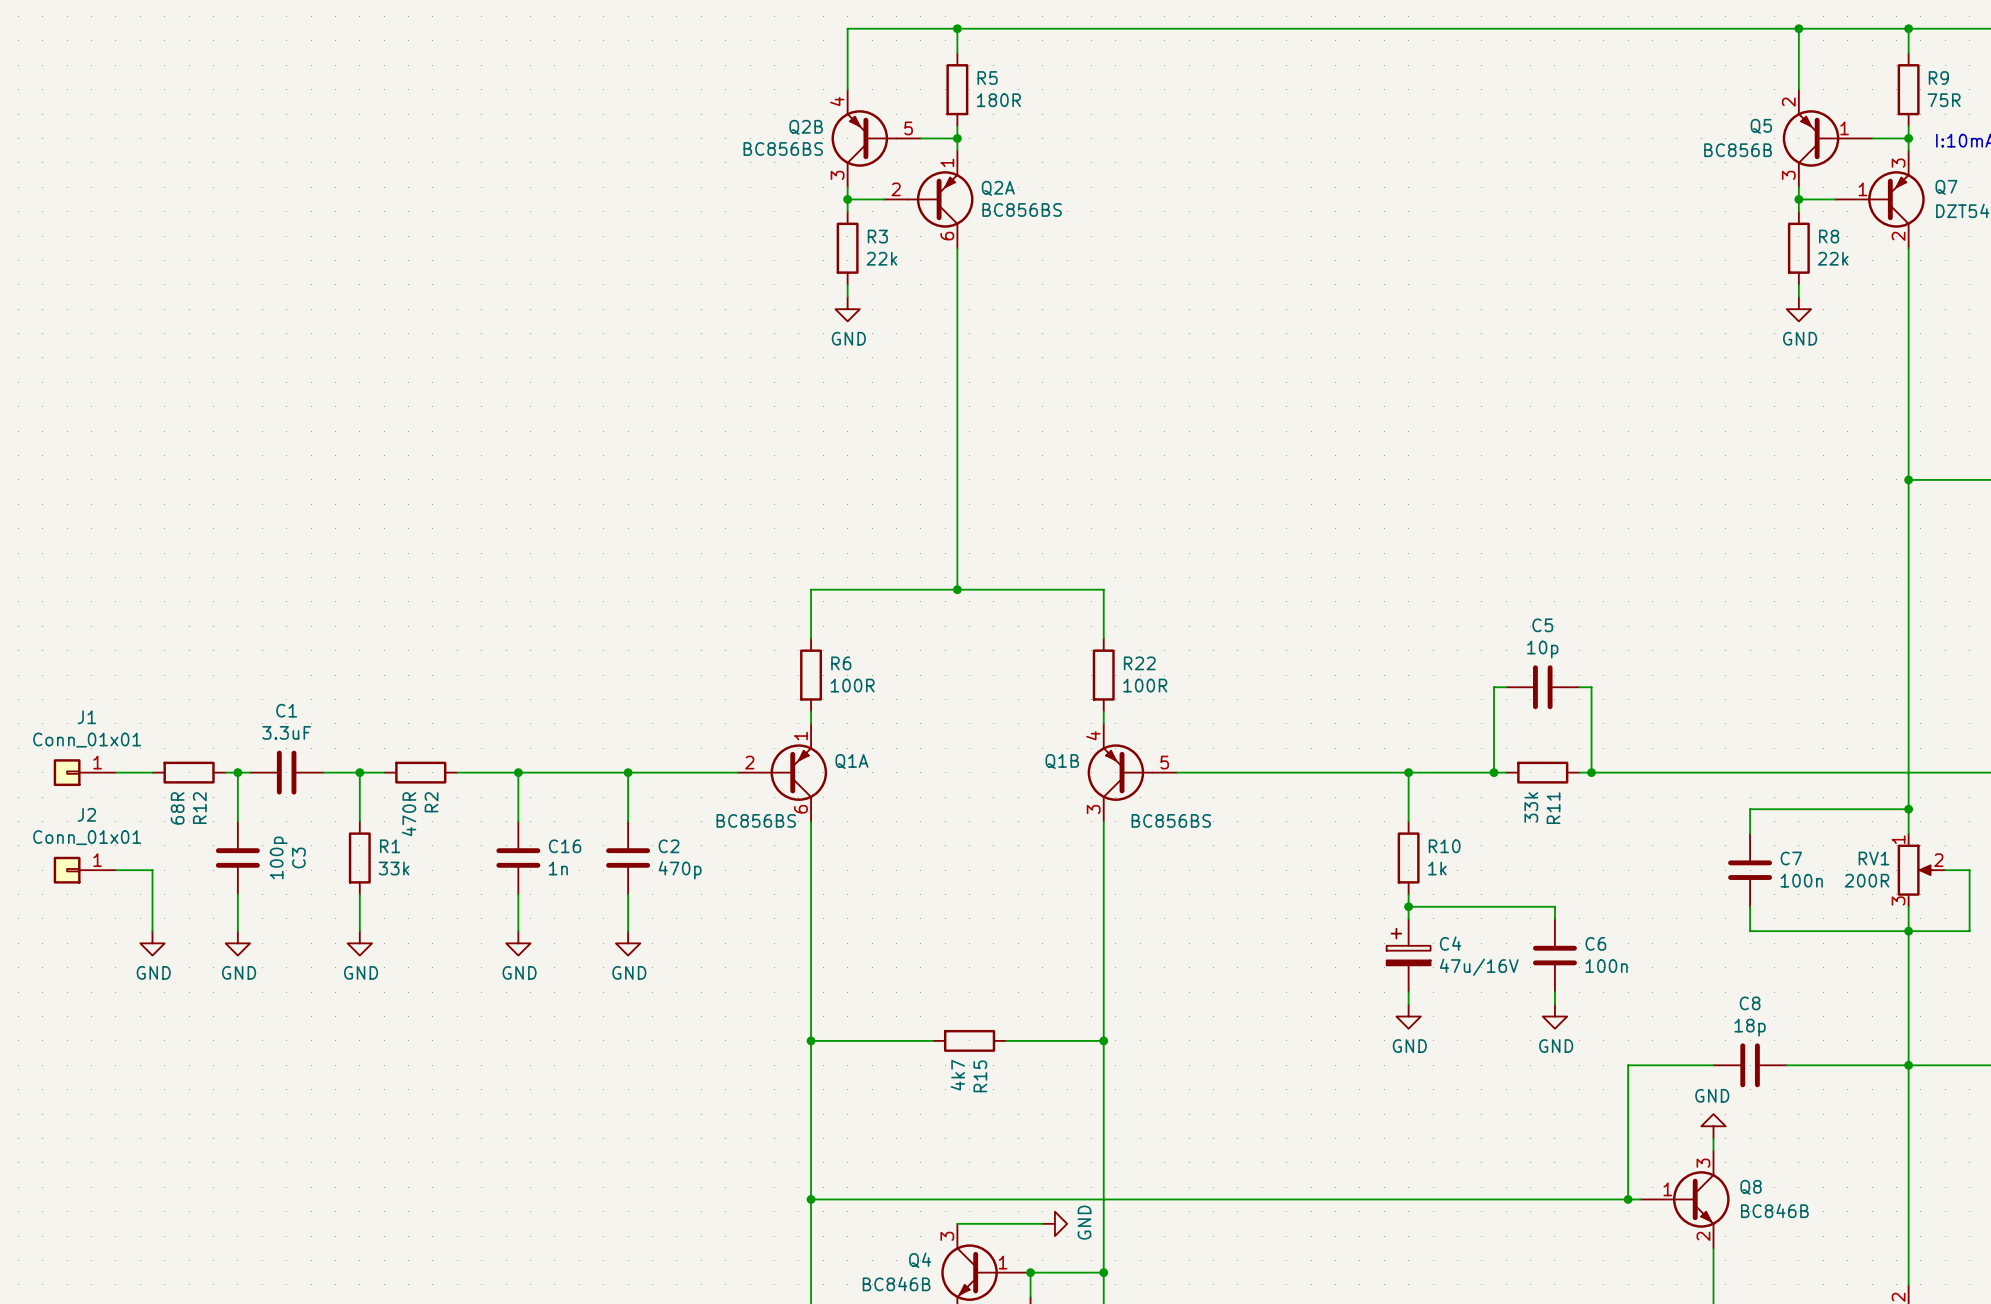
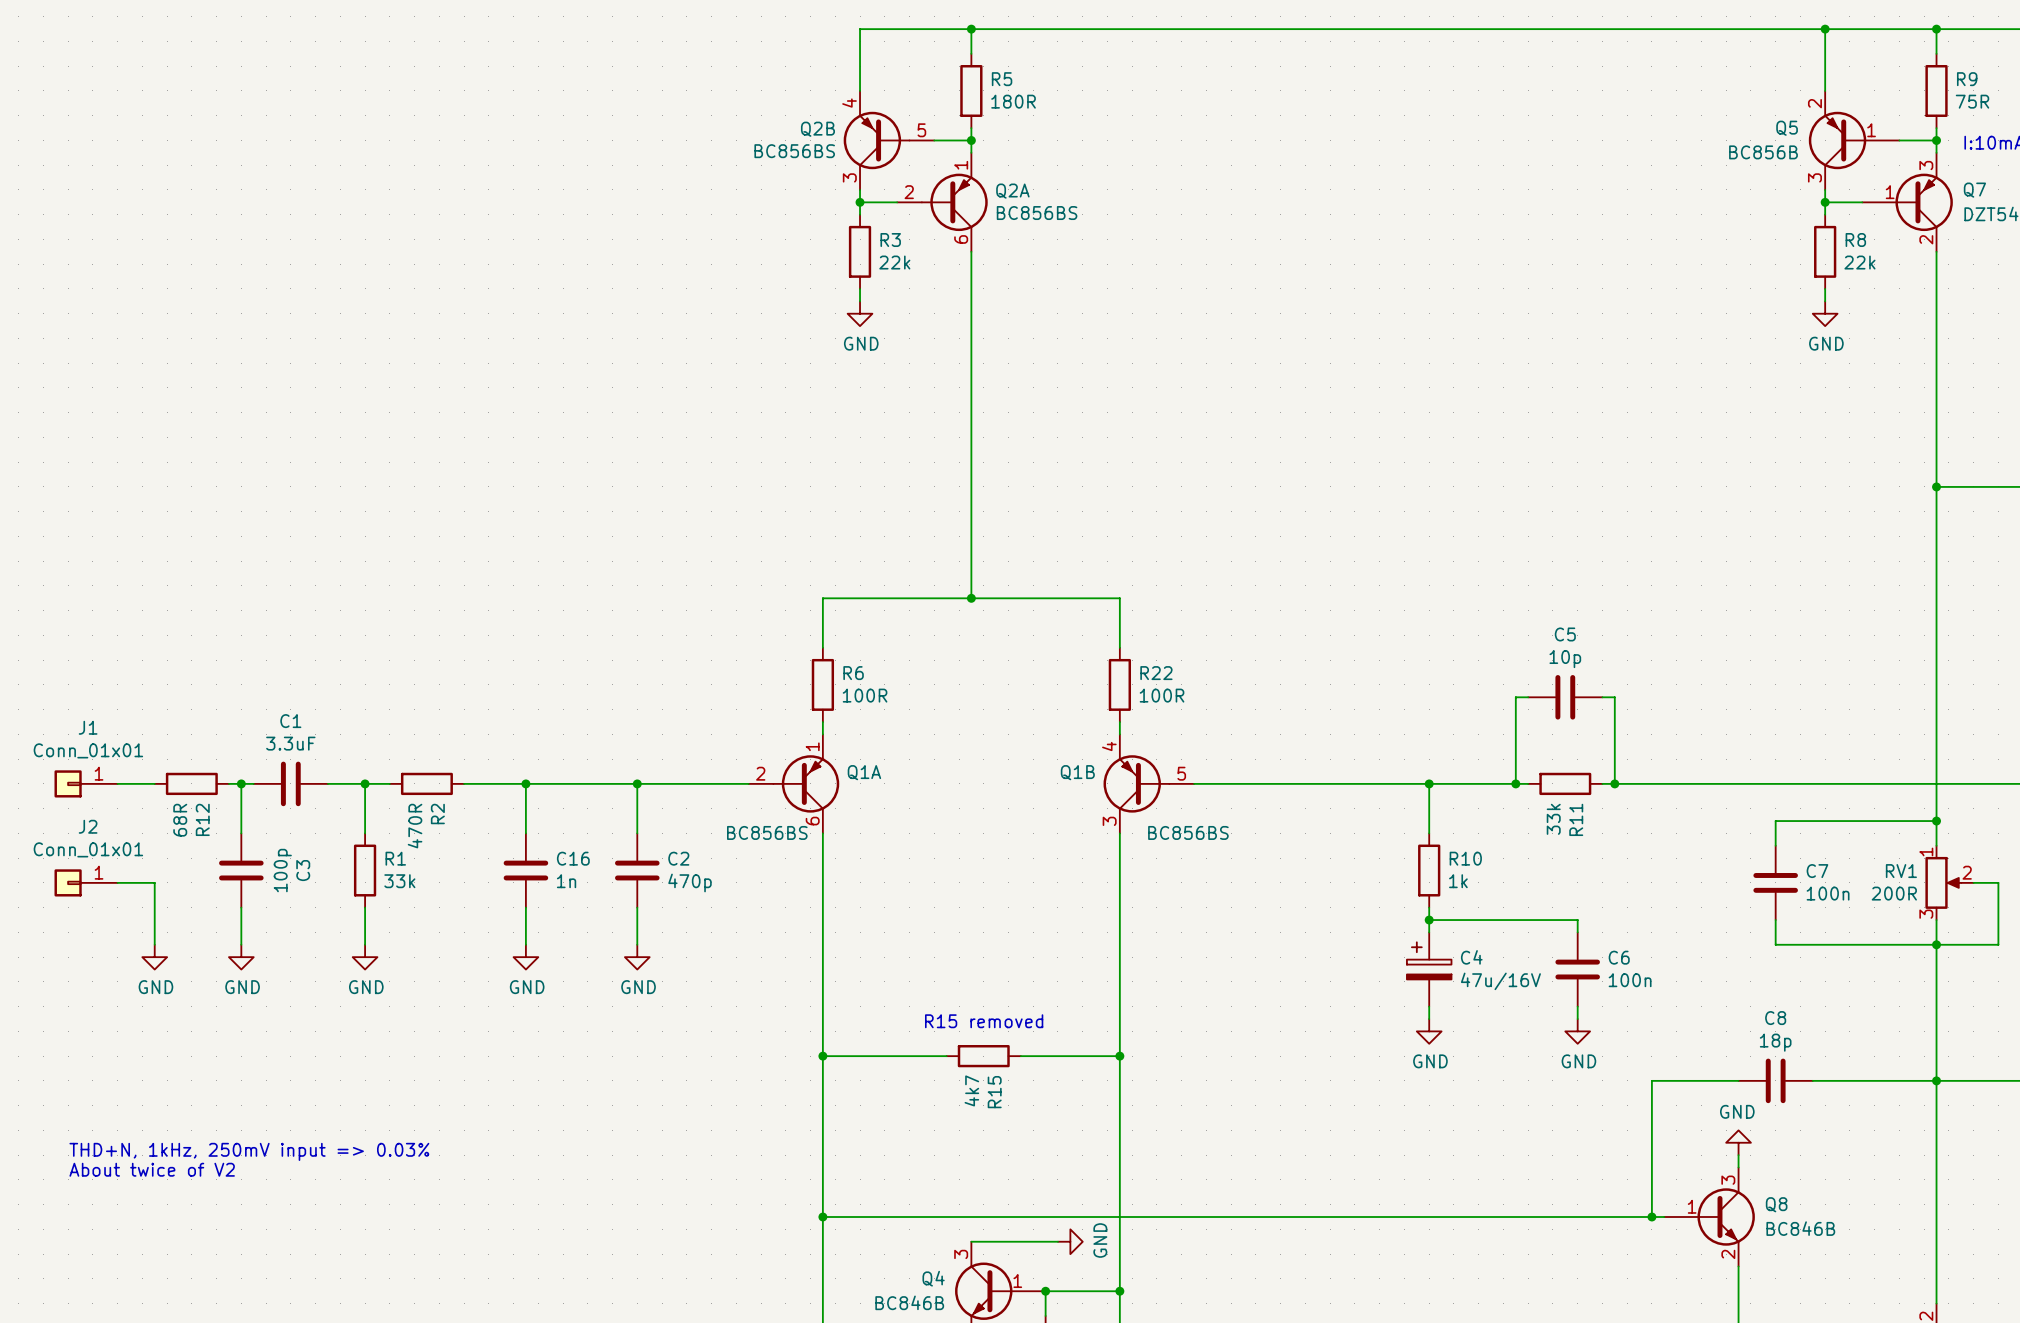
text: none -> R15 removed (984, 1021)
text: none -> THD+N, 1kHz, 250mV input => 0.03% (249, 1151)
text: none -> About twice of V2 (152, 1169)

